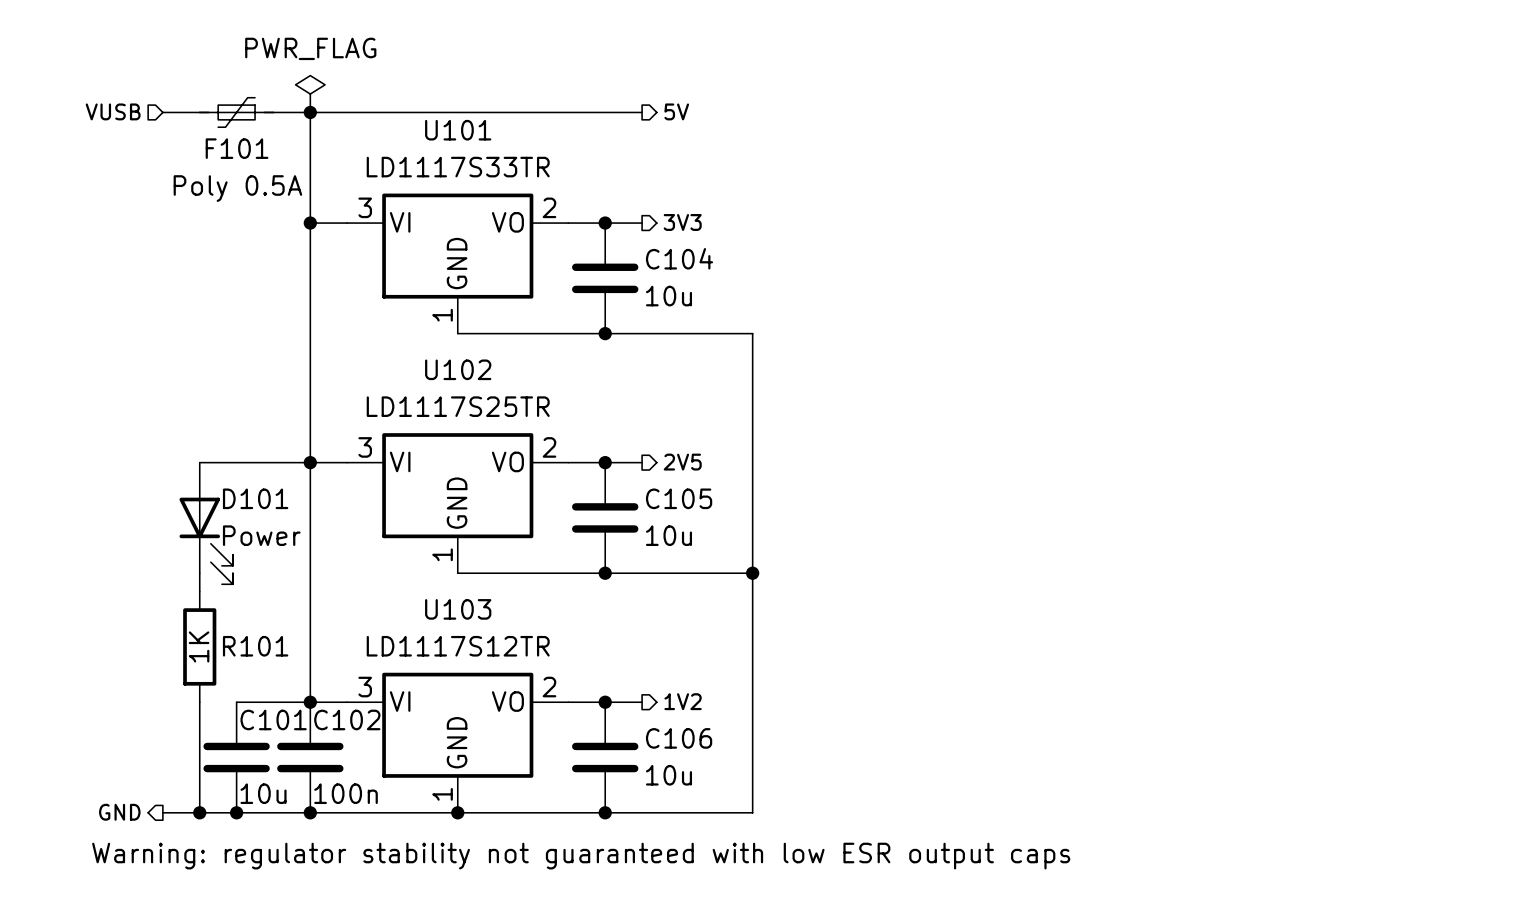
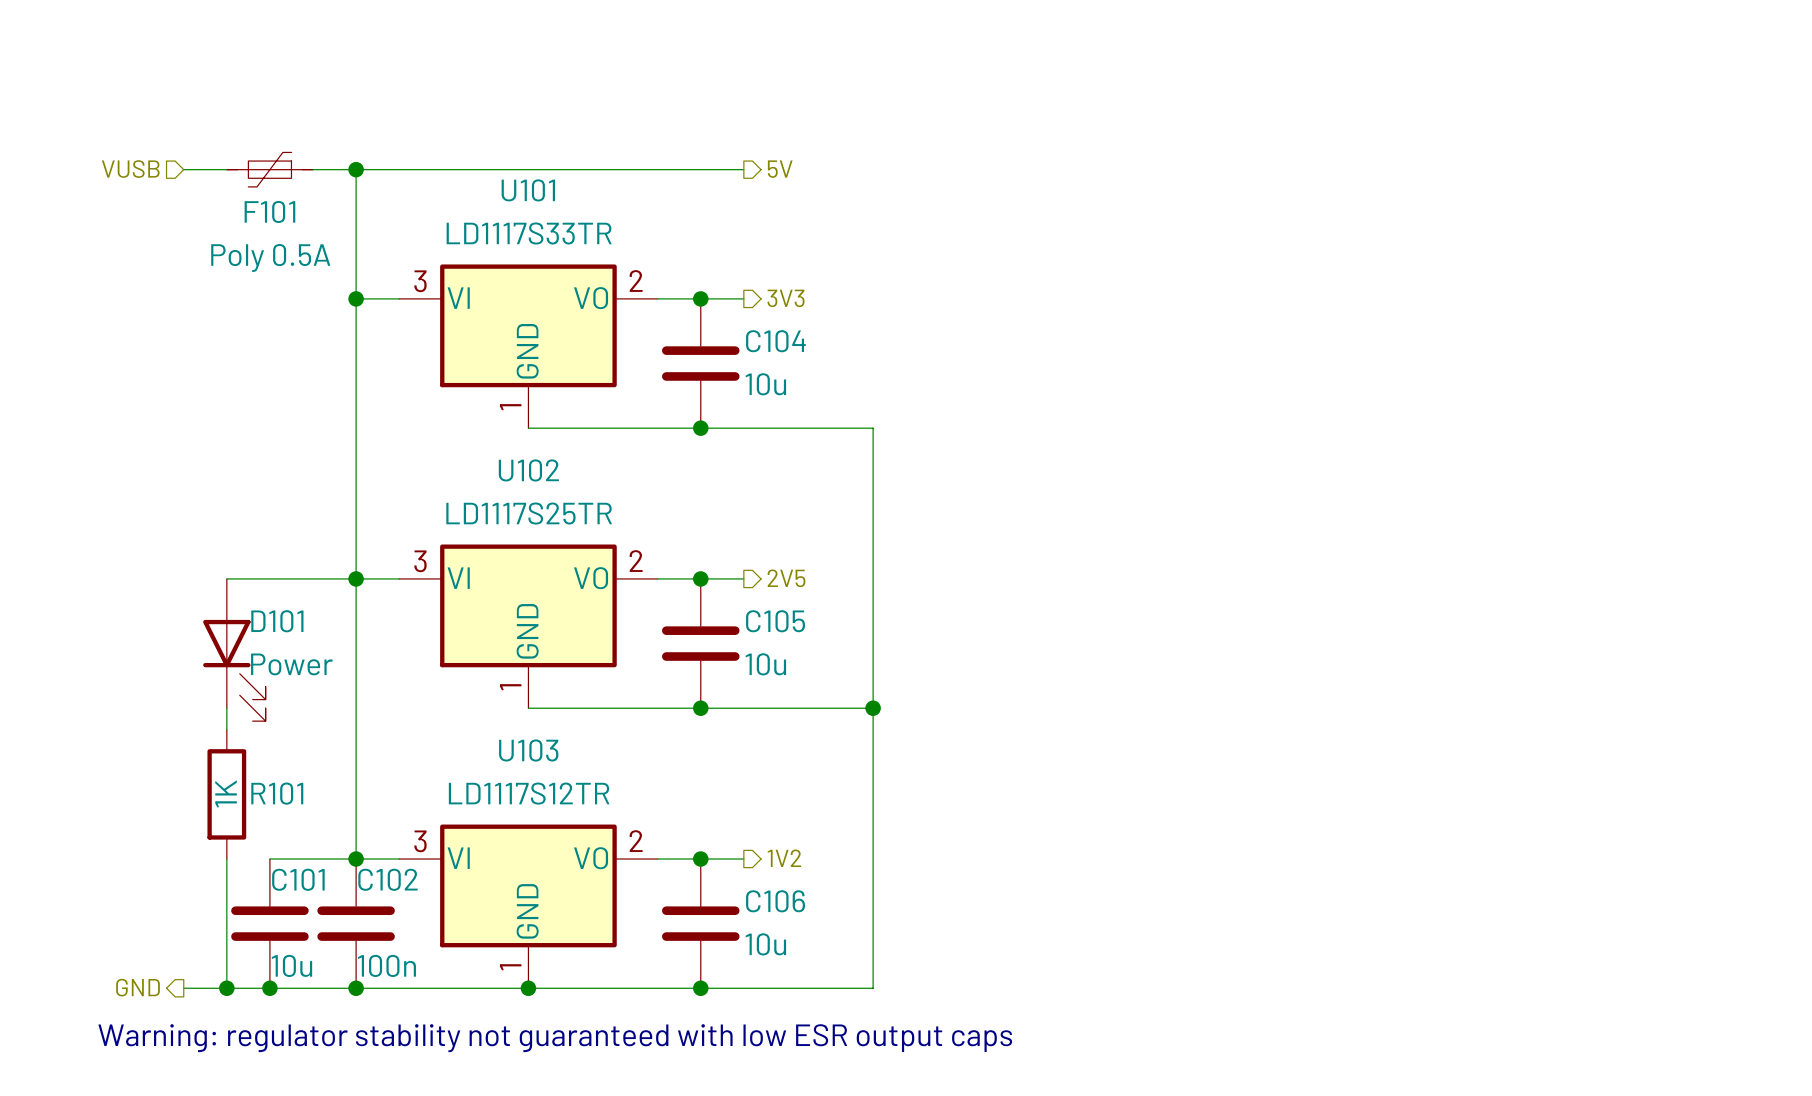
power symbol: PWR_FLAG (310, 94) -> none

